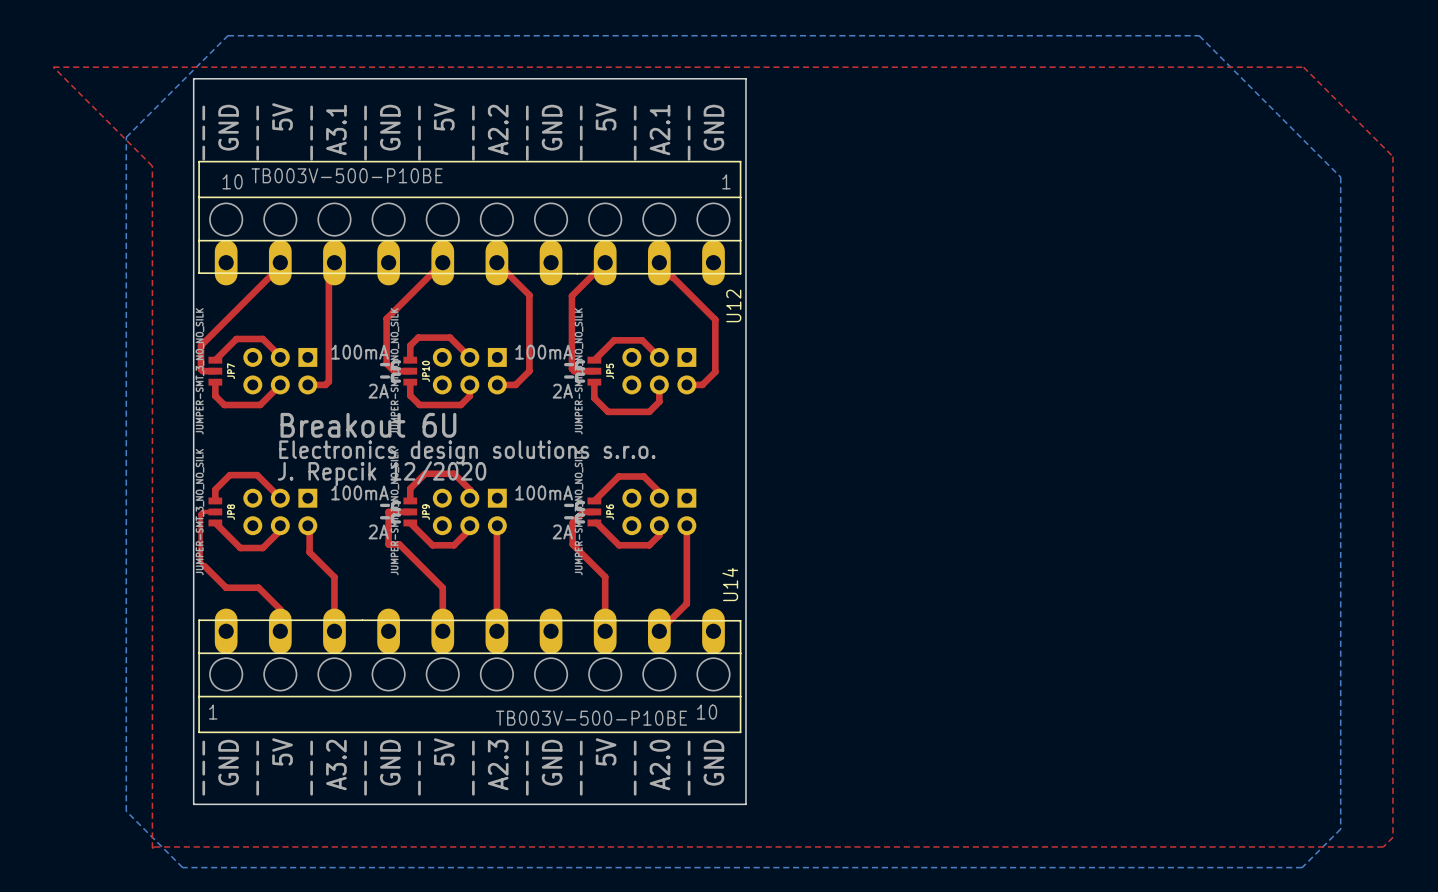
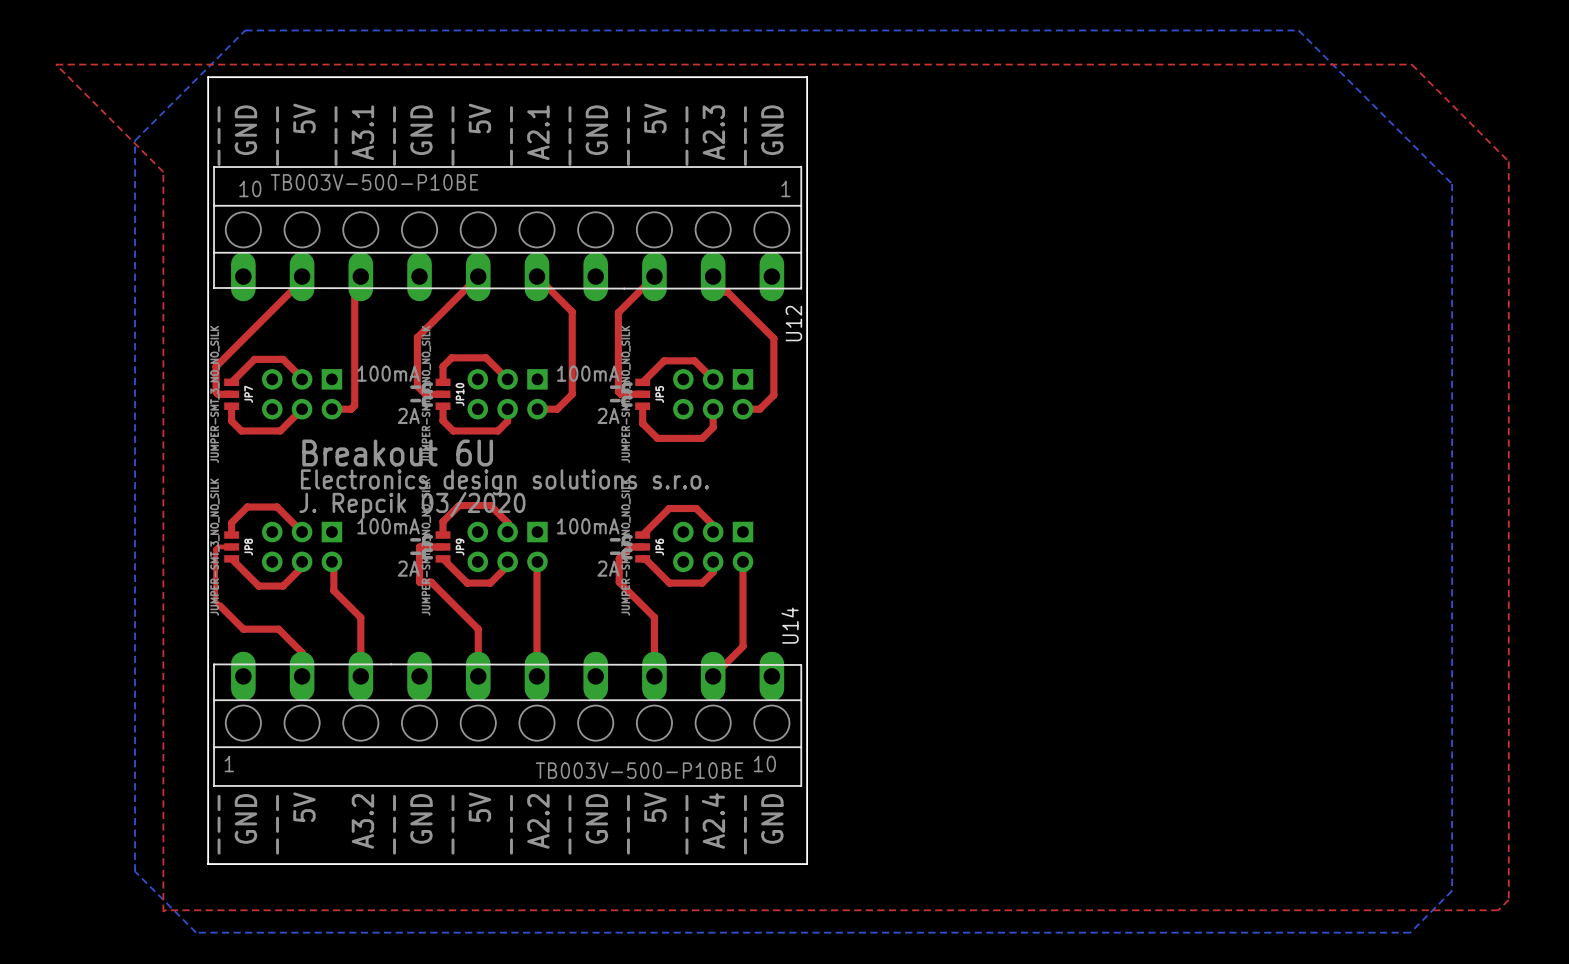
text: A2.2 (498, 129) -> A2.1 (538, 132)
text: A2.1 (660, 129) -> A2.3 (713, 132)
text: J. Repcik 12/2020 (382, 473) -> J. Repcik 03/2020 (412, 505)
text: A2.3 (498, 765) -> A2.2 (538, 821)
text: A2.0 (660, 765) -> A2.4 (713, 821)
text: --- (311, 768) -> none

